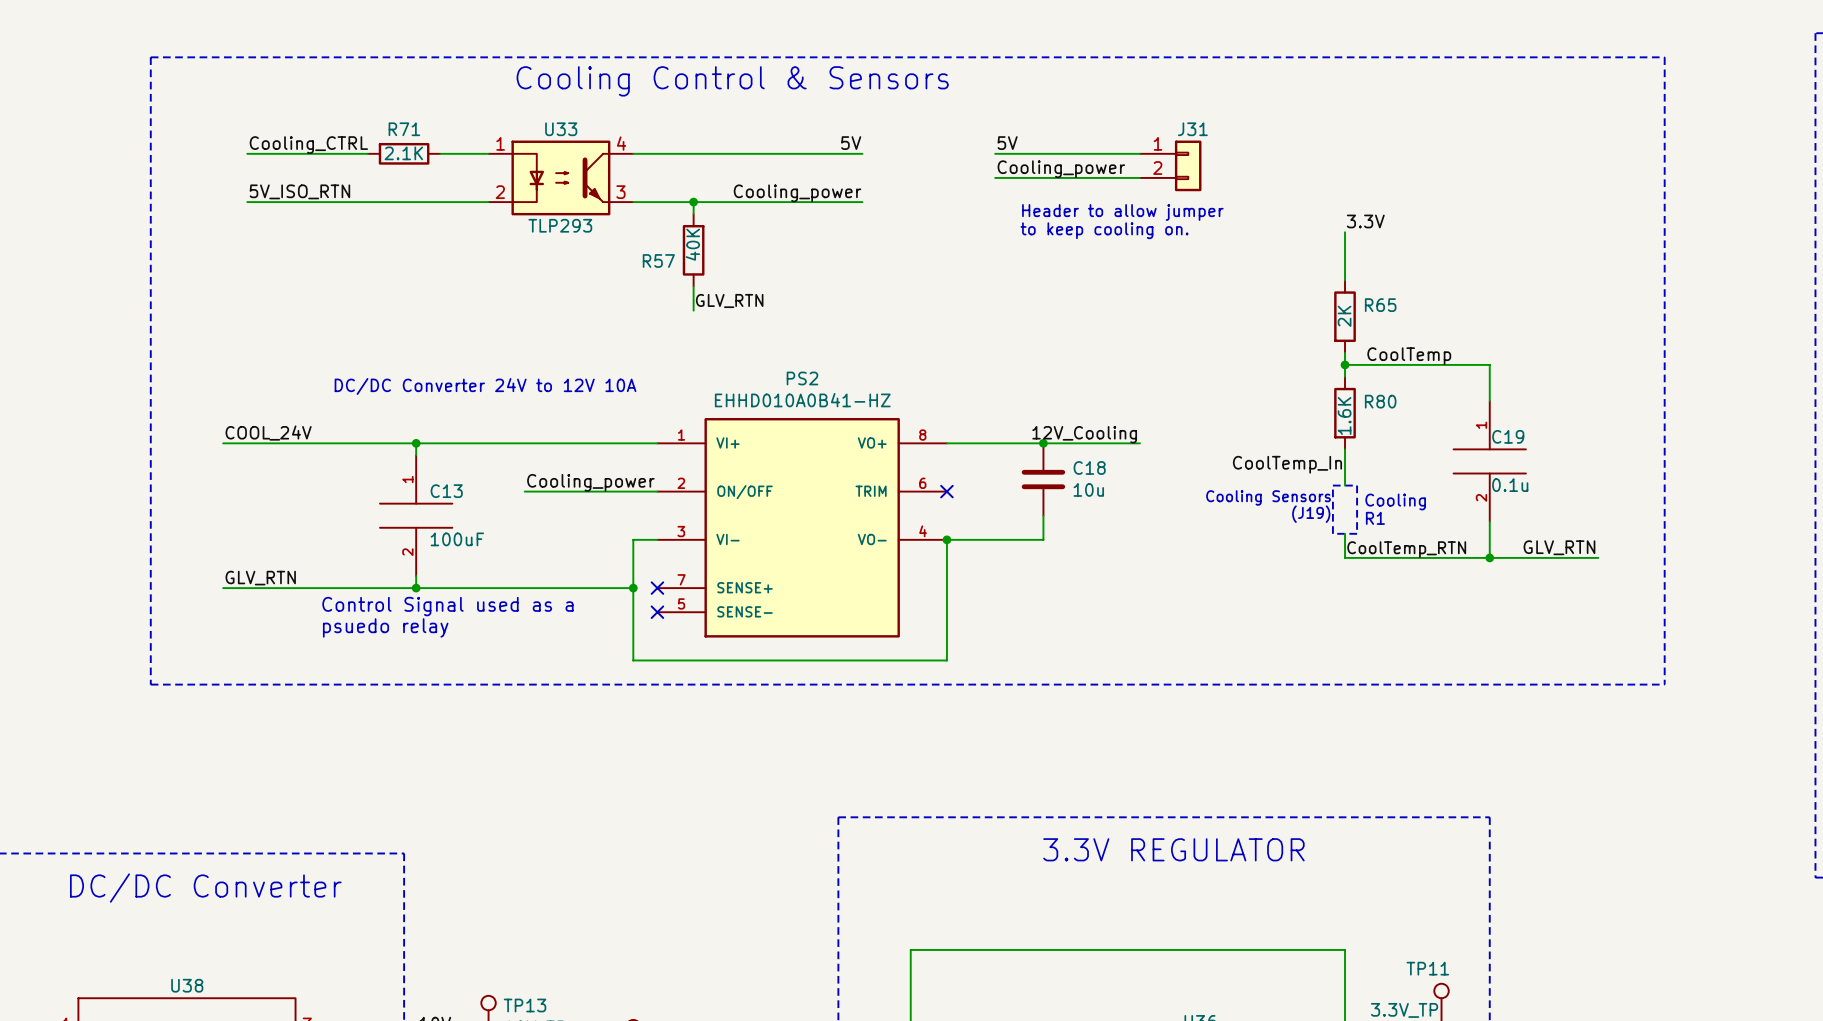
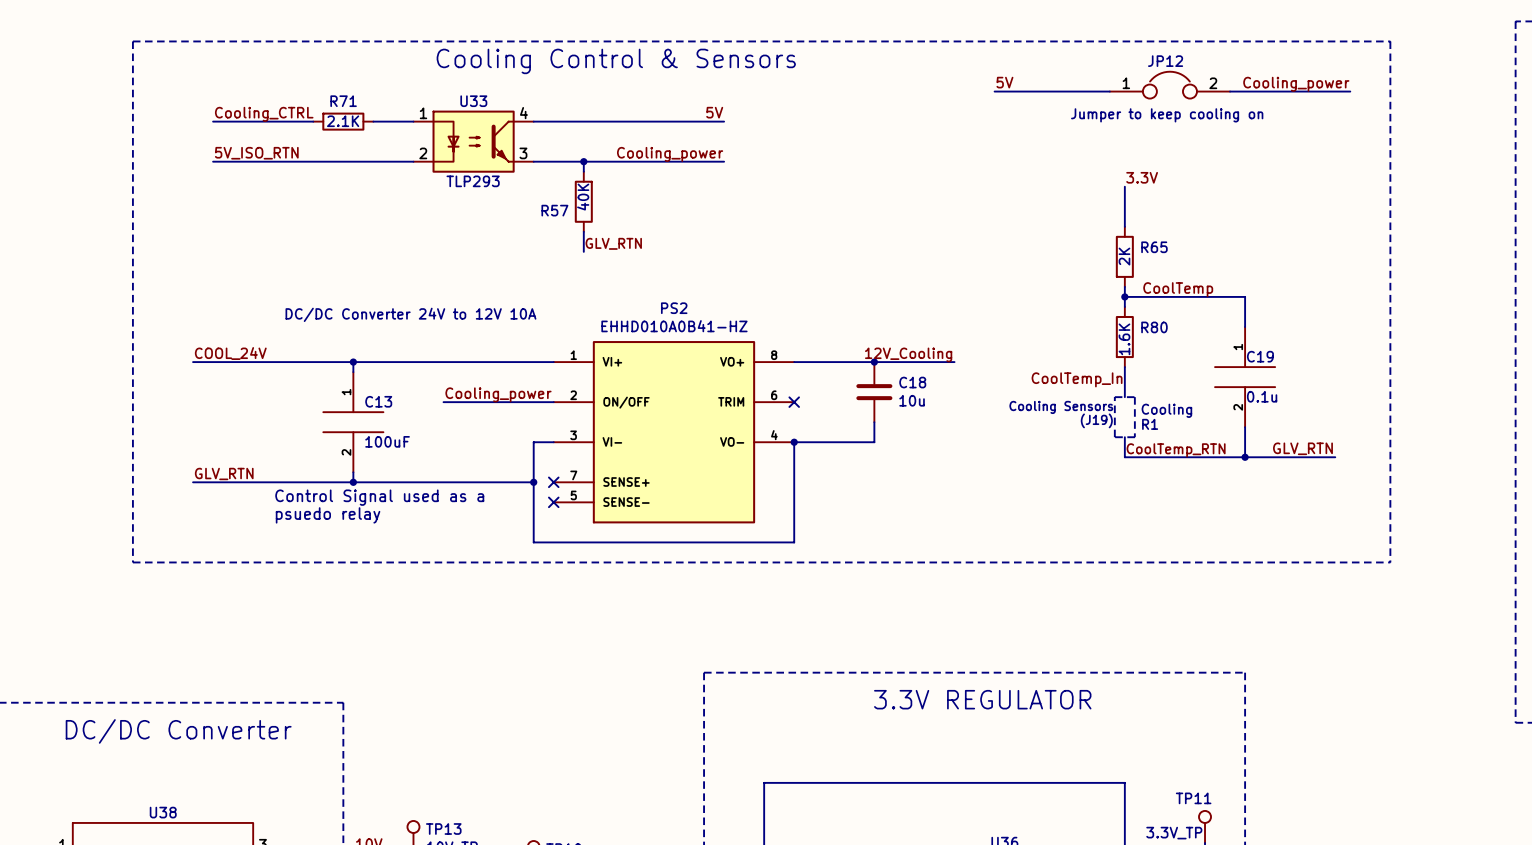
label: none -> Cooling_power (1296, 84)
JP12: none -> (1169, 85)
wire: none -> (994, 91) (1109, 91)
wire: none -> (1230, 91) (1350, 91)
label position: 5V (1007, 143) -> 5V (1004, 82)
text: none -> Jumper to keep cooling on (1167, 115)
wire: (995, 153) (1139, 153) -> none
J31: (1170, 165) -> none
label: Cooling_power (1061, 169) -> none
wire: (995, 177) (1139, 177) -> none
text: Header to allow jumper (1122, 212) -> none
text: to keep cooling on. (1104, 230) -> none

